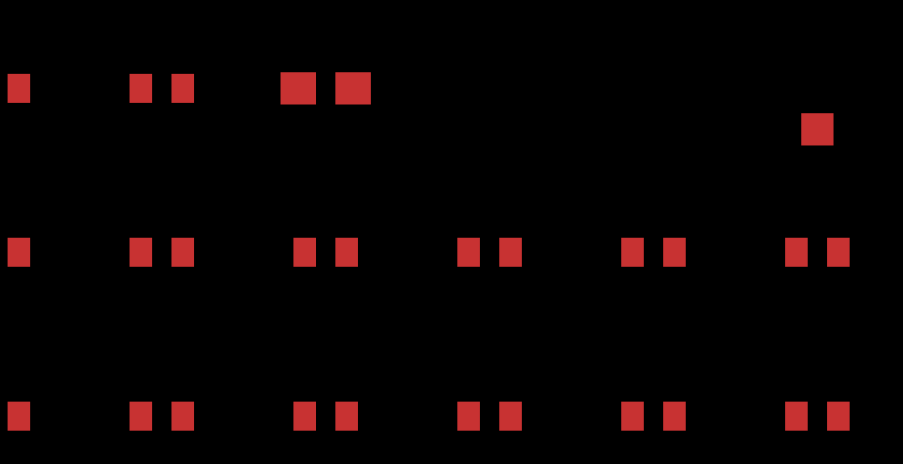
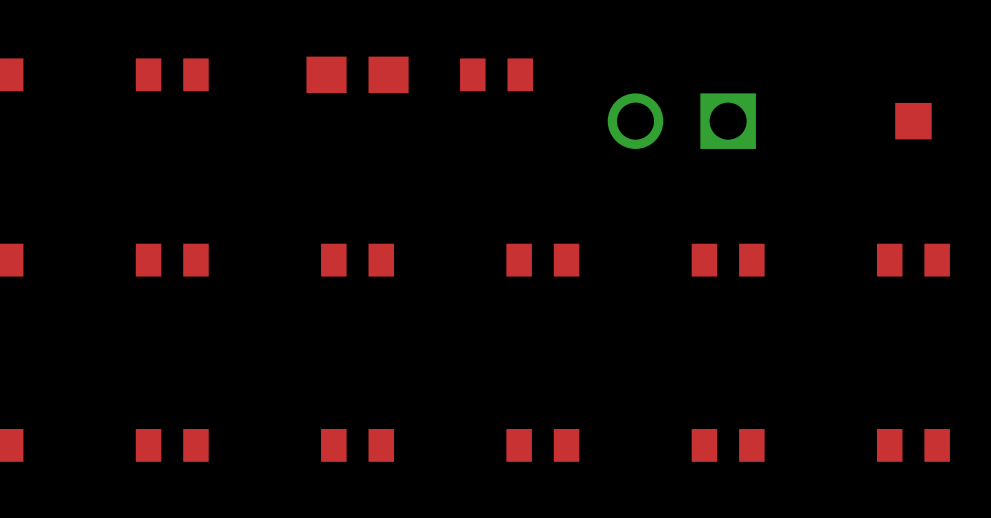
part: none -> (496, 74)
part: none -> (681, 121)

